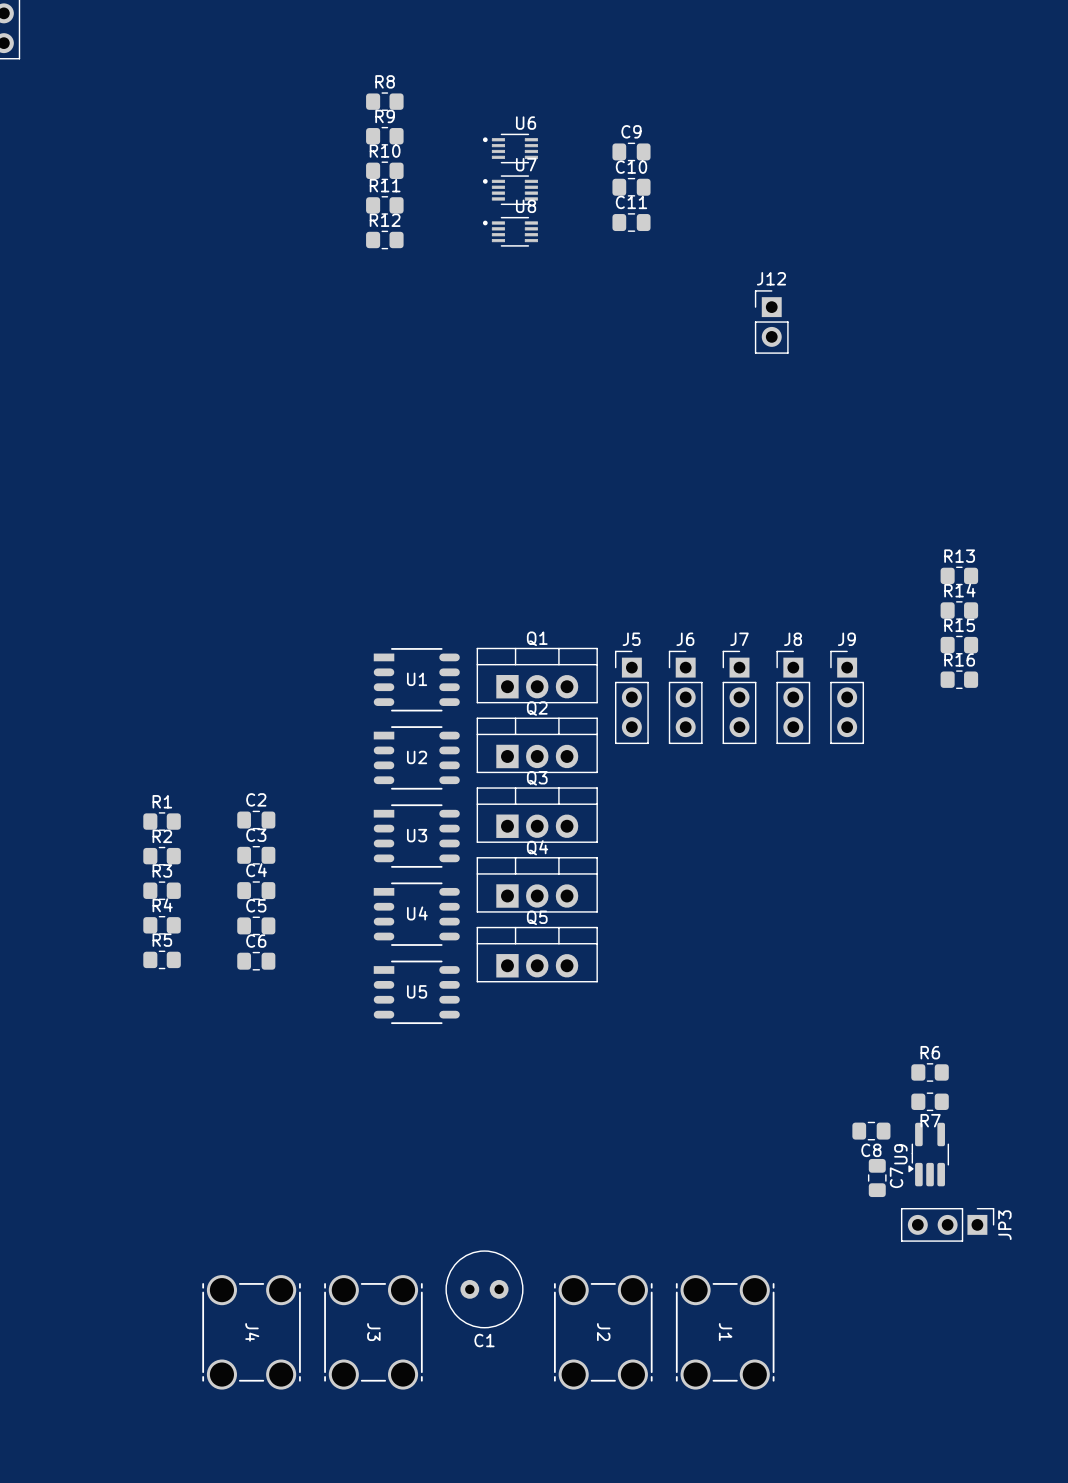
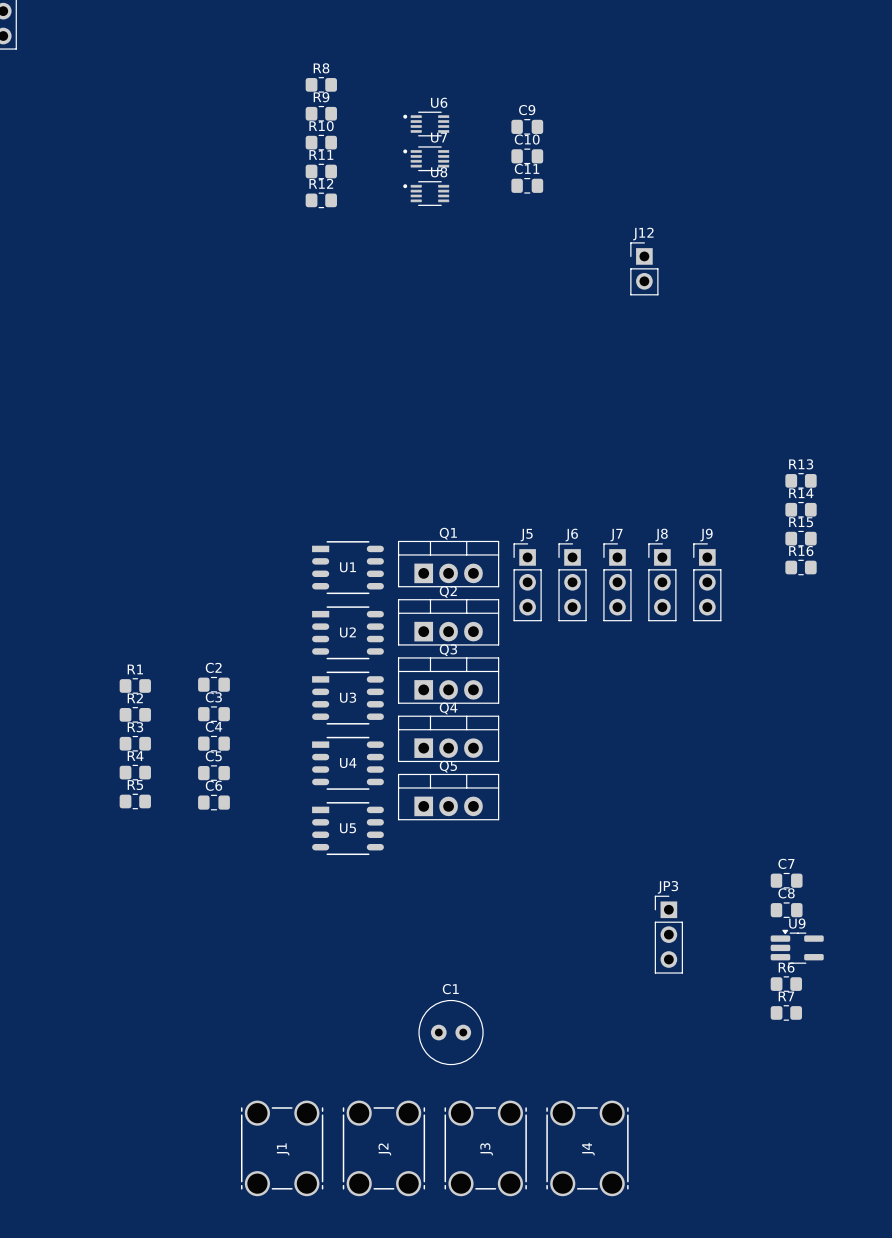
R6 position: (930, 1072) -> (786, 984)
R7 position: (930, 1101) -> (786, 1012)
R7 name position: R7 (930, 1120) -> R7 (786, 996)
C8 position: (871, 1131) -> (786, 910)
C8 name position: C8 (871, 1150) -> C8 (786, 893)
U9 rotation: 0° (928, 1154) -> 90° clockwise (797, 946)
C7 rotation: 0° (877, 1177) -> 90° clockwise (786, 880)
C7 position: (877, 1177) -> (786, 880)
C7 name position: C7 (896, 1177) -> C7 (786, 863)
JP3 rotation: 0° (947, 1224) -> 90° counterclockwise (668, 934)
JP3 position: (947, 1224) -> (668, 934)
C1 position: (484, 1289) -> (451, 1032)
J4 position: (251, 1332) -> (587, 1148)
J4 name rotation: 0° (252, 1332) -> 180° (588, 1149)
J3 position: (373, 1332) -> (485, 1148)
J3 name rotation: 0° (373, 1332) -> 180° (486, 1149)
J2 position: (603, 1332) -> (383, 1148)
J2 name rotation: 0° (603, 1332) -> 180° (384, 1149)
J1 position: (725, 1332) -> (282, 1148)
J1 name rotation: 0° (725, 1332) -> 180° (283, 1149)
C1 name position: C1 (484, 1340) -> C1 (450, 989)

